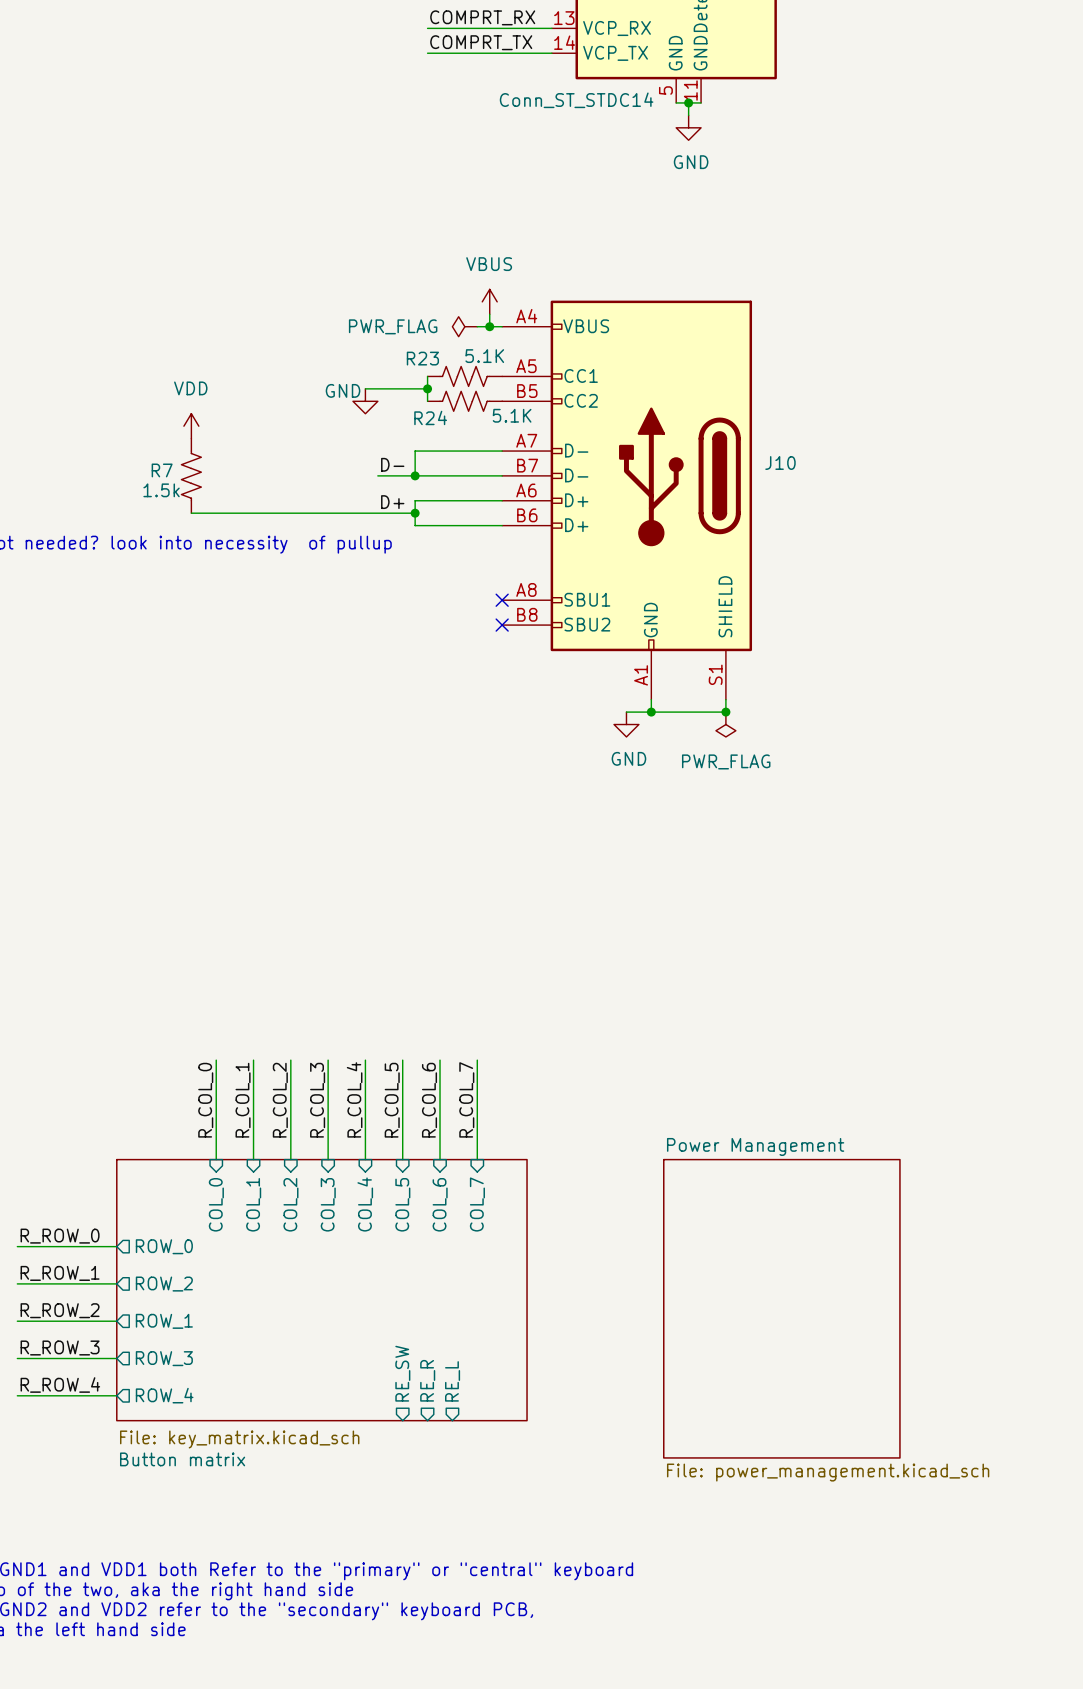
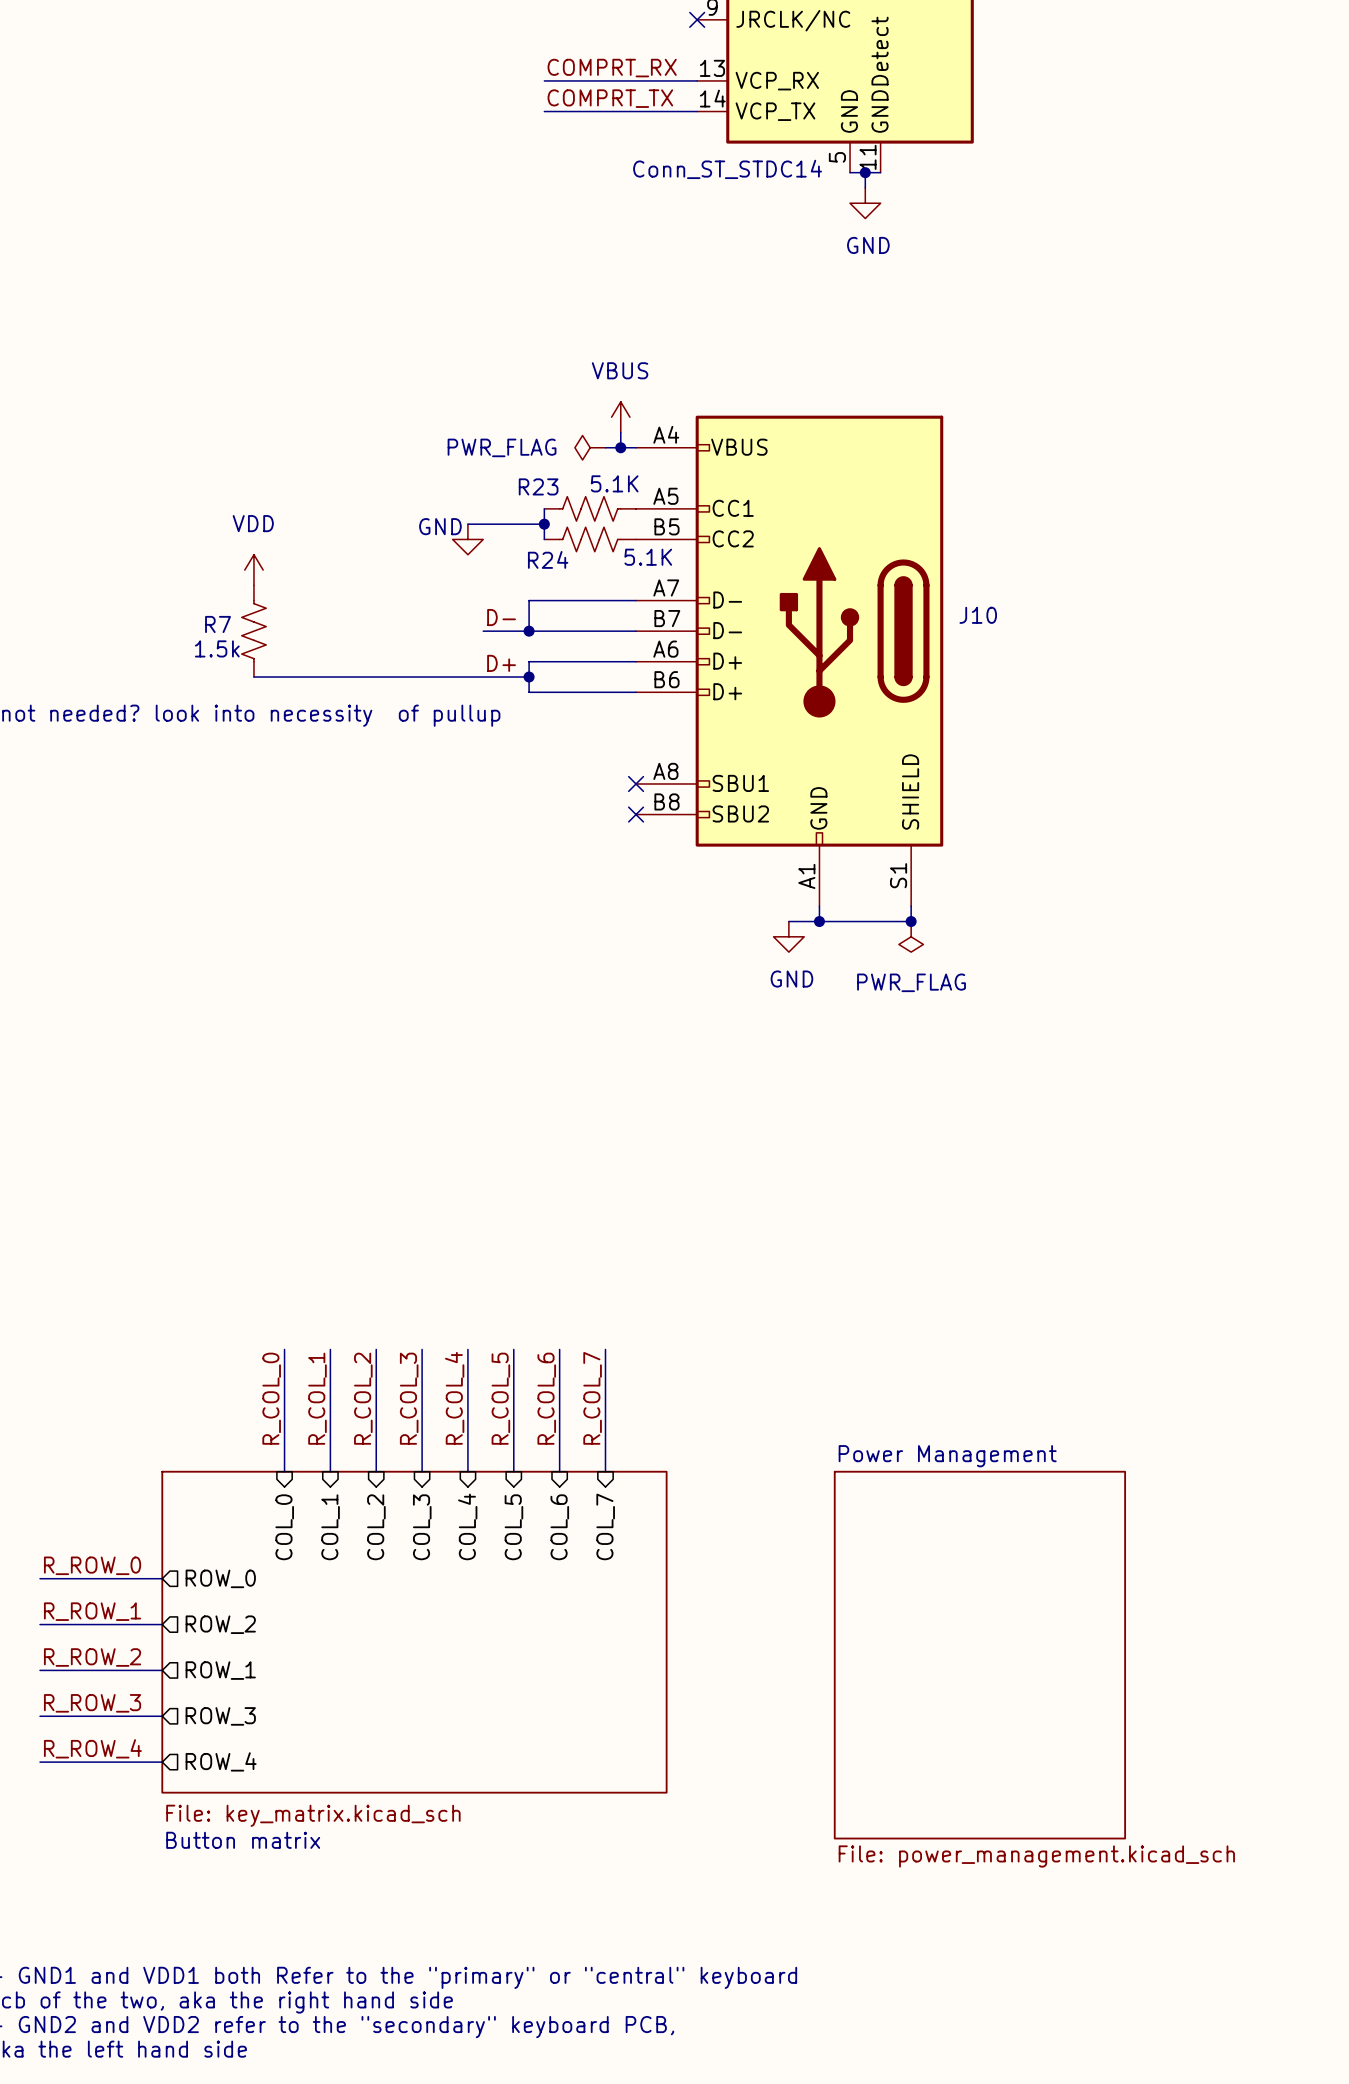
sheet pin: RE_SW (402, 1373) -> none
sheet pin: RE_R (427, 1380) -> none
sheet pin: RE_L (452, 1381) -> none

